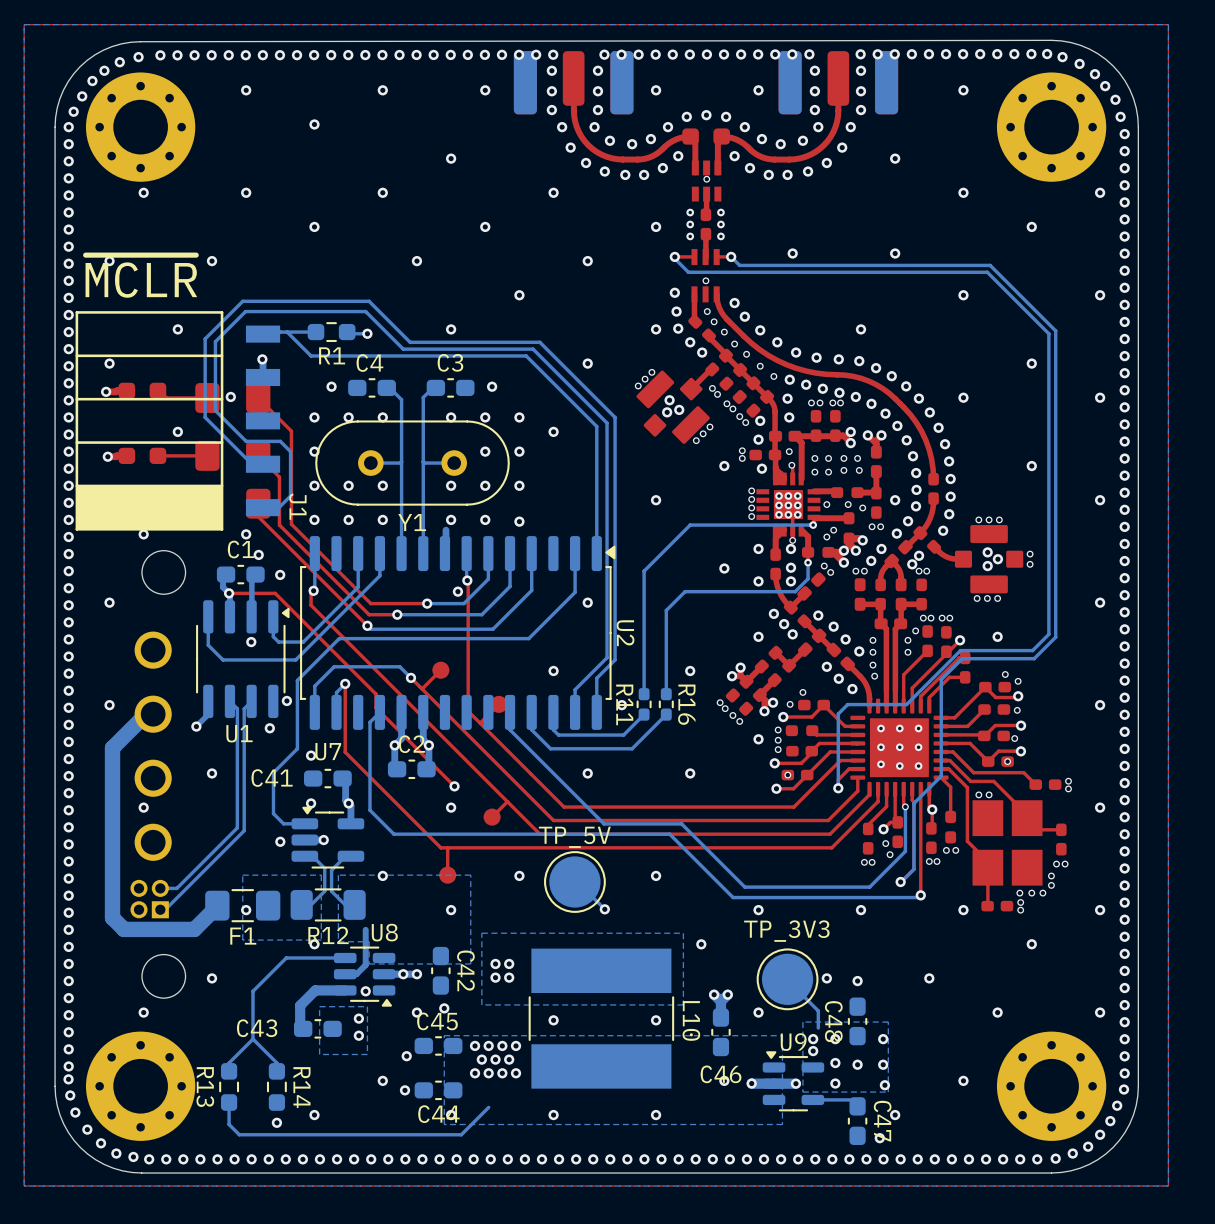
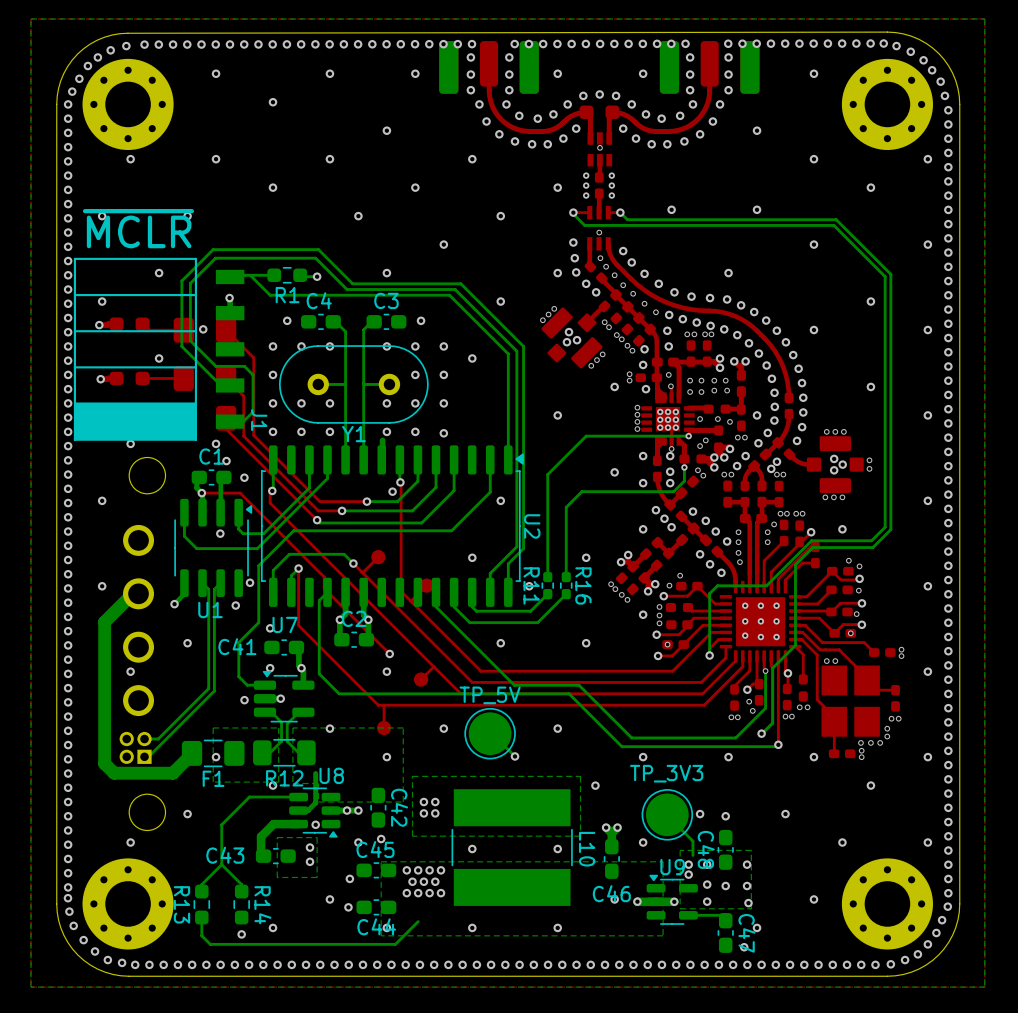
Y1 footprint: [315, 420, 510, 506] -> [278, 345, 429, 424]

